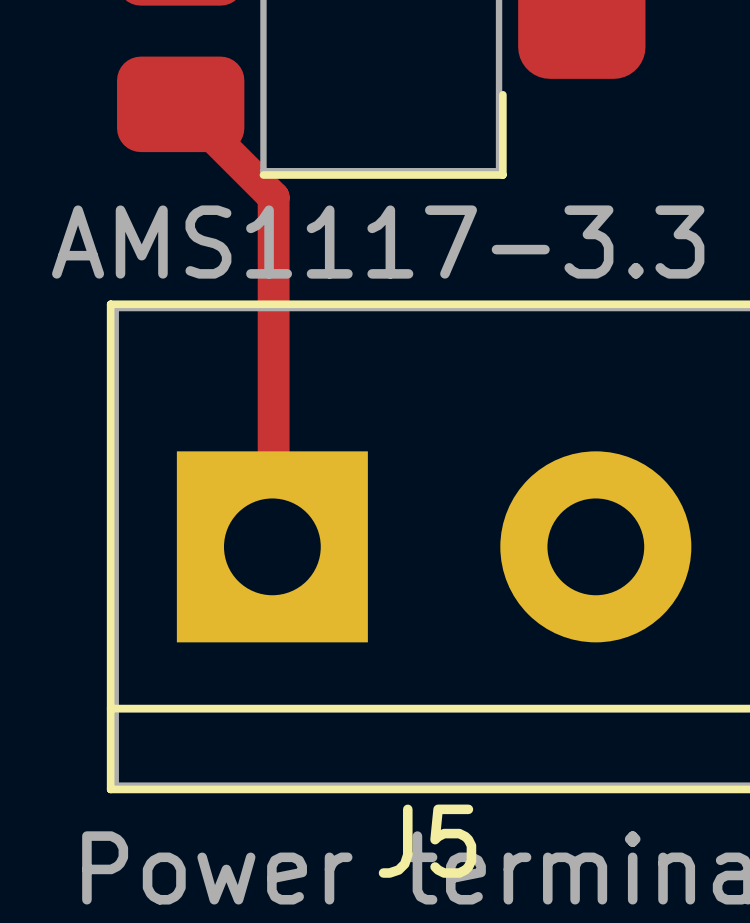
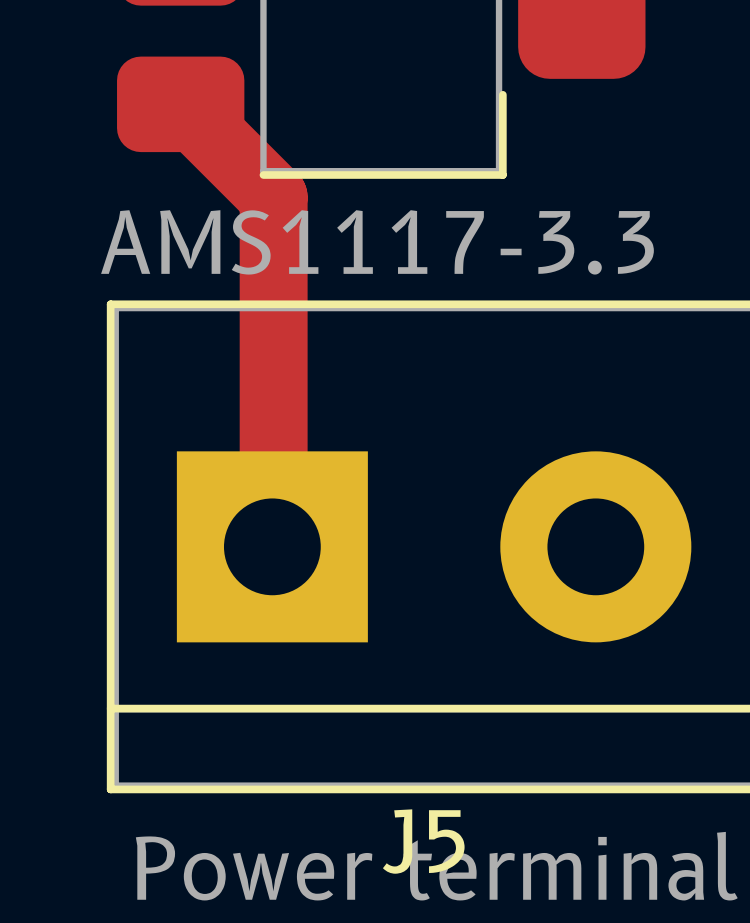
top track width: thin (180, 104) (273, 197) (272, 546) -> thick (180, 104) (273, 197) (272, 546)

